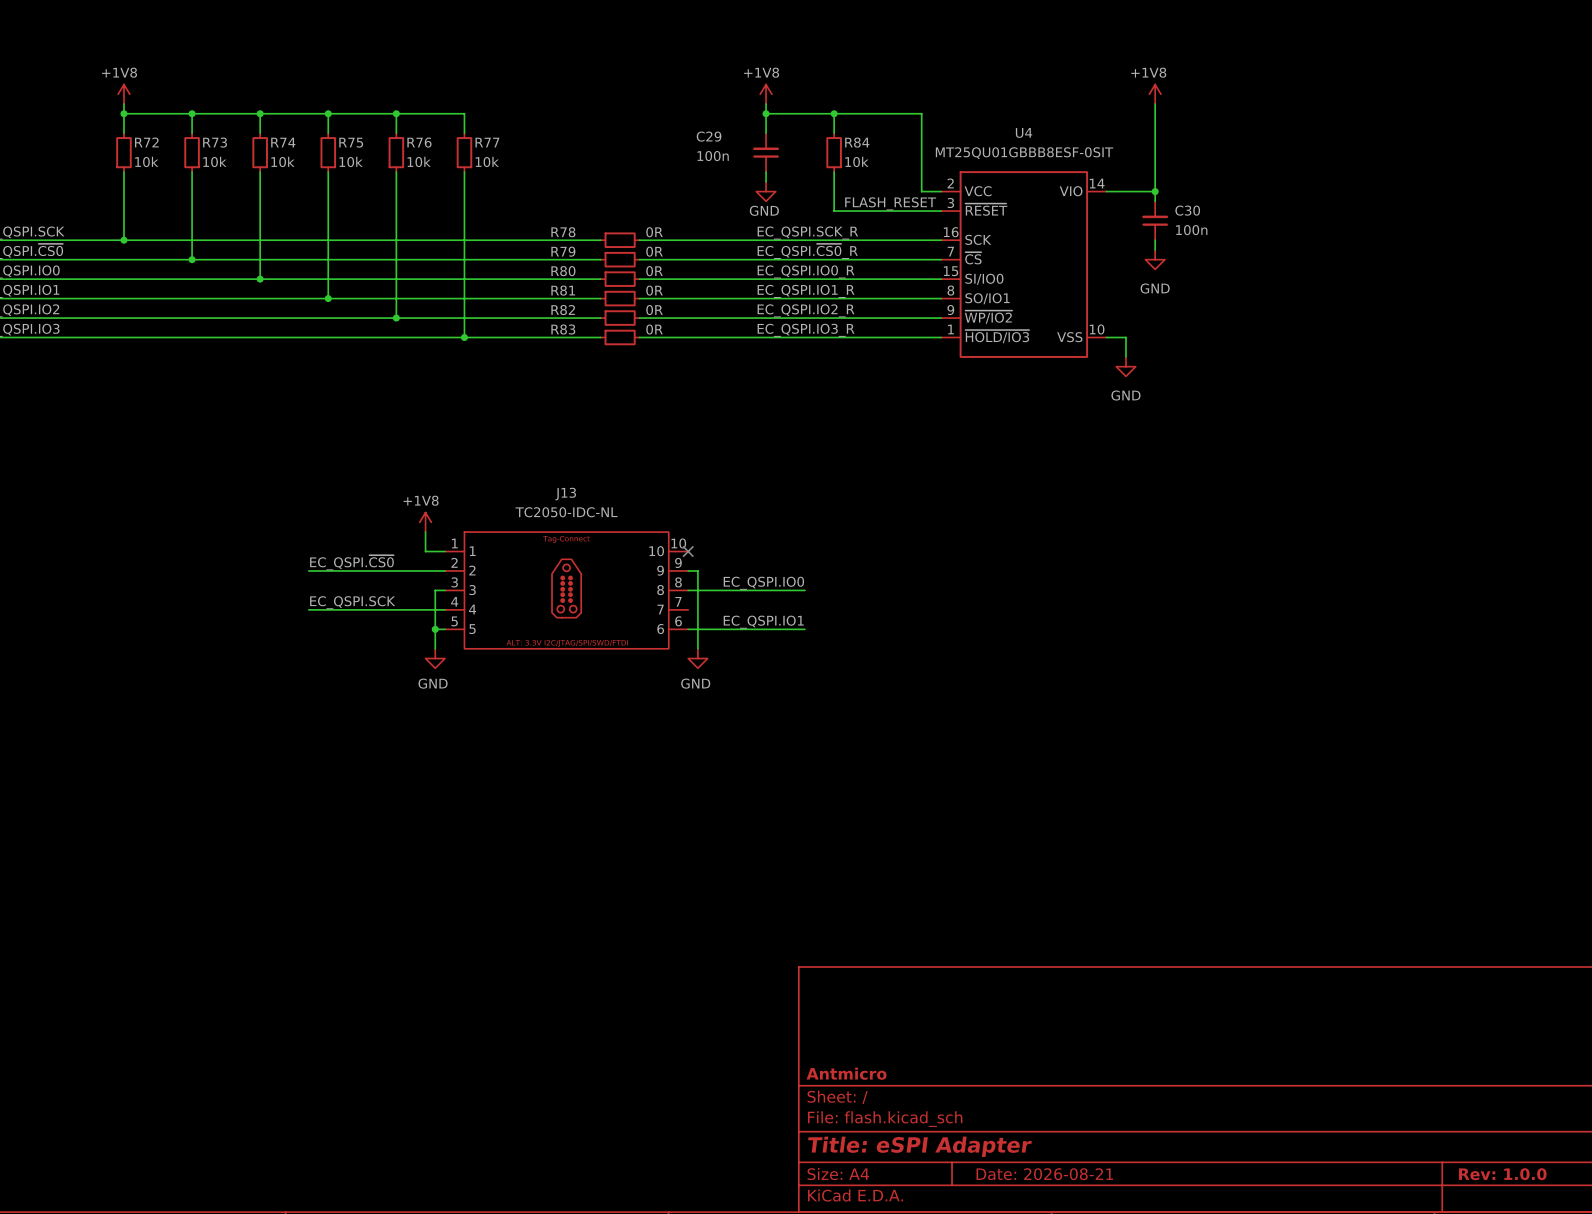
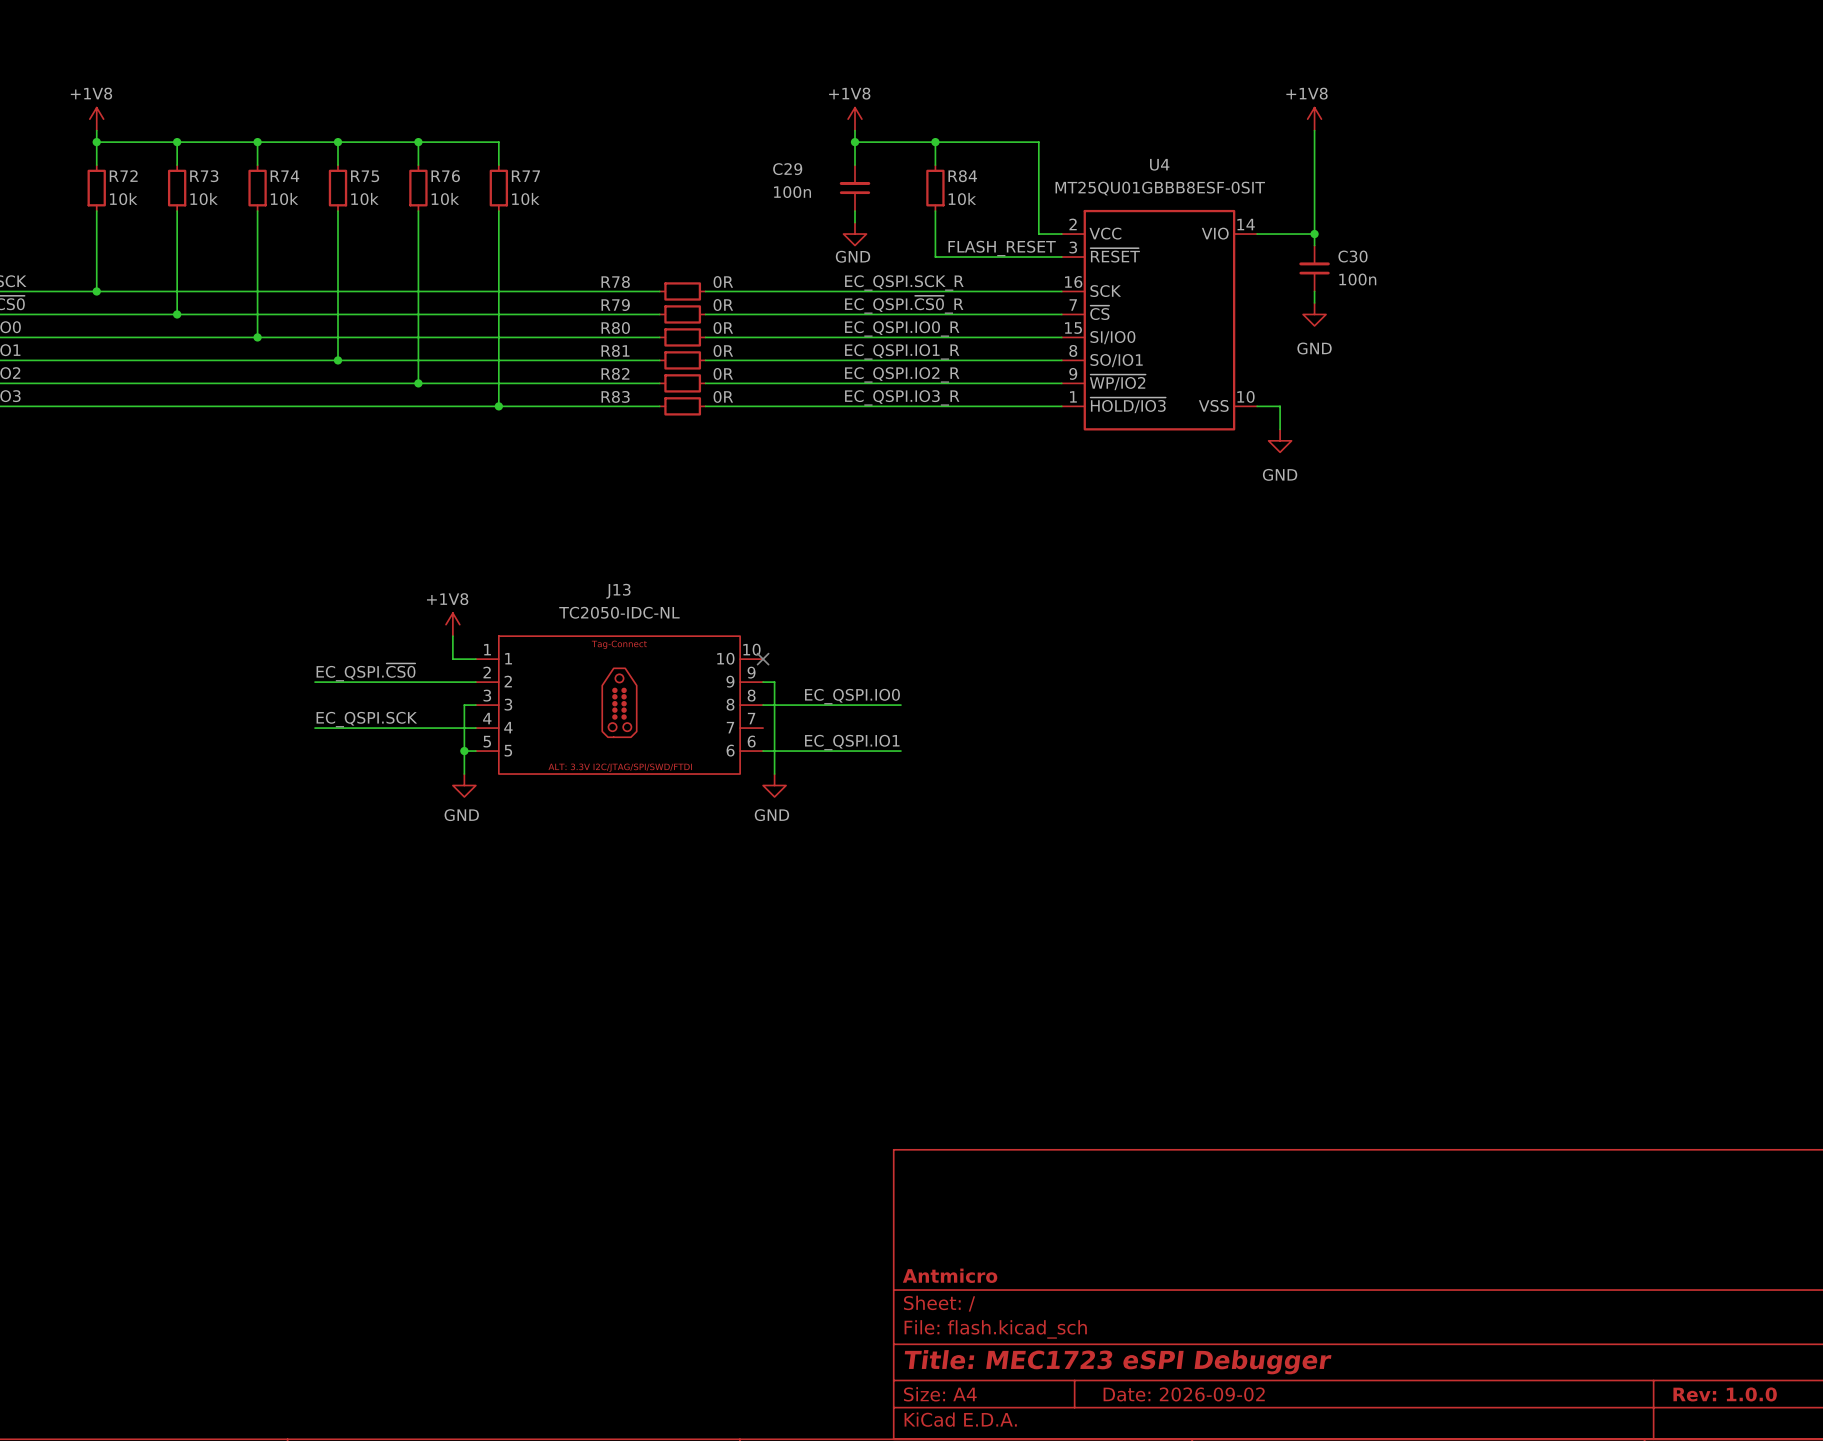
title block: Title: eSPI Adapter (919, 1146) -> Title: MEC1723 eSPI Debugger (1118, 1362)
title block: Date: 2026-08-21 (1044, 1174) -> Date: 2026-09-02 (1184, 1394)

